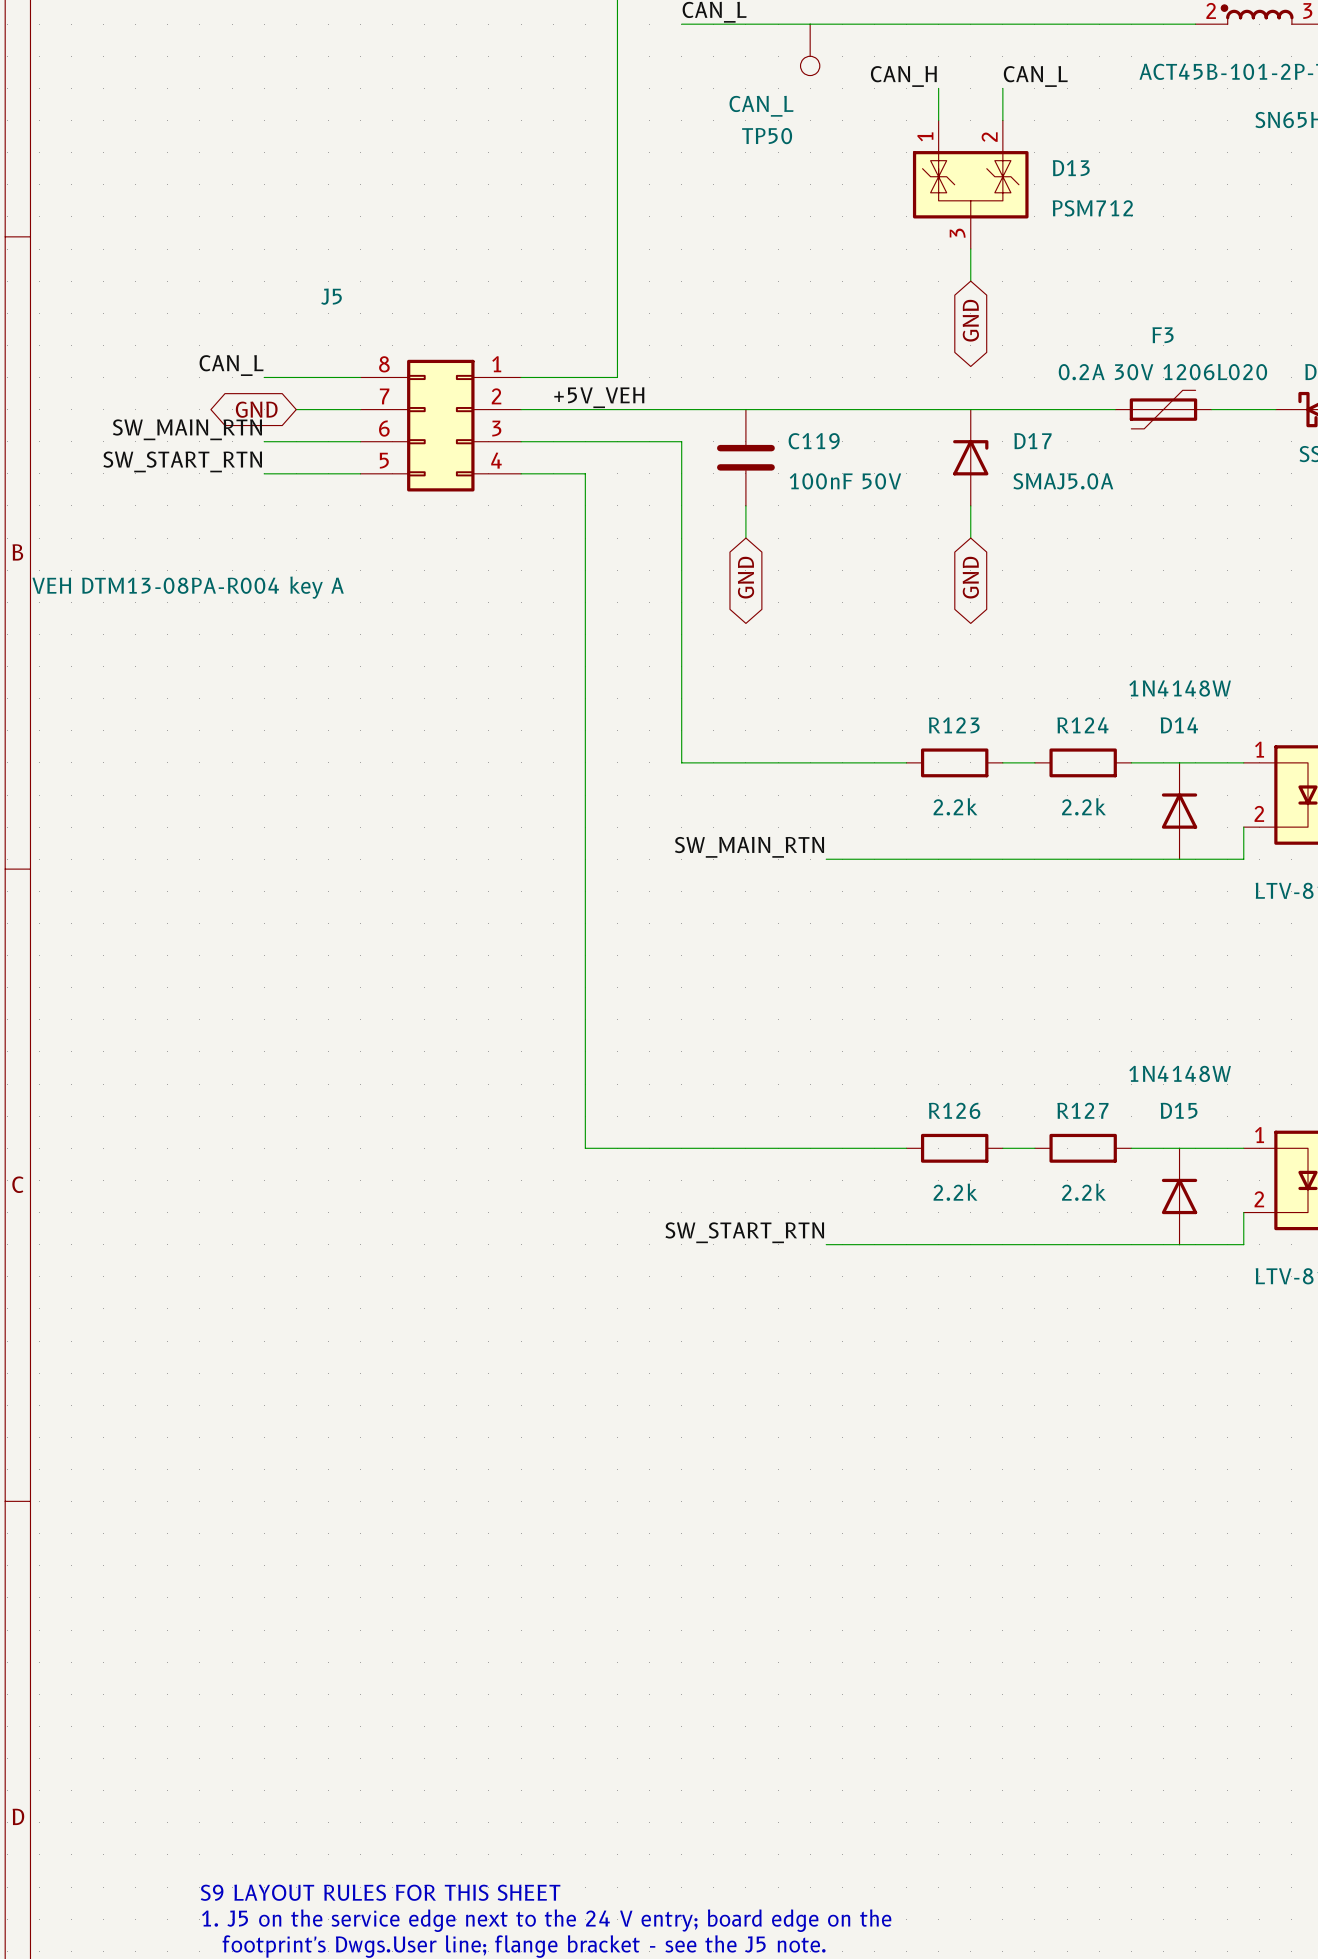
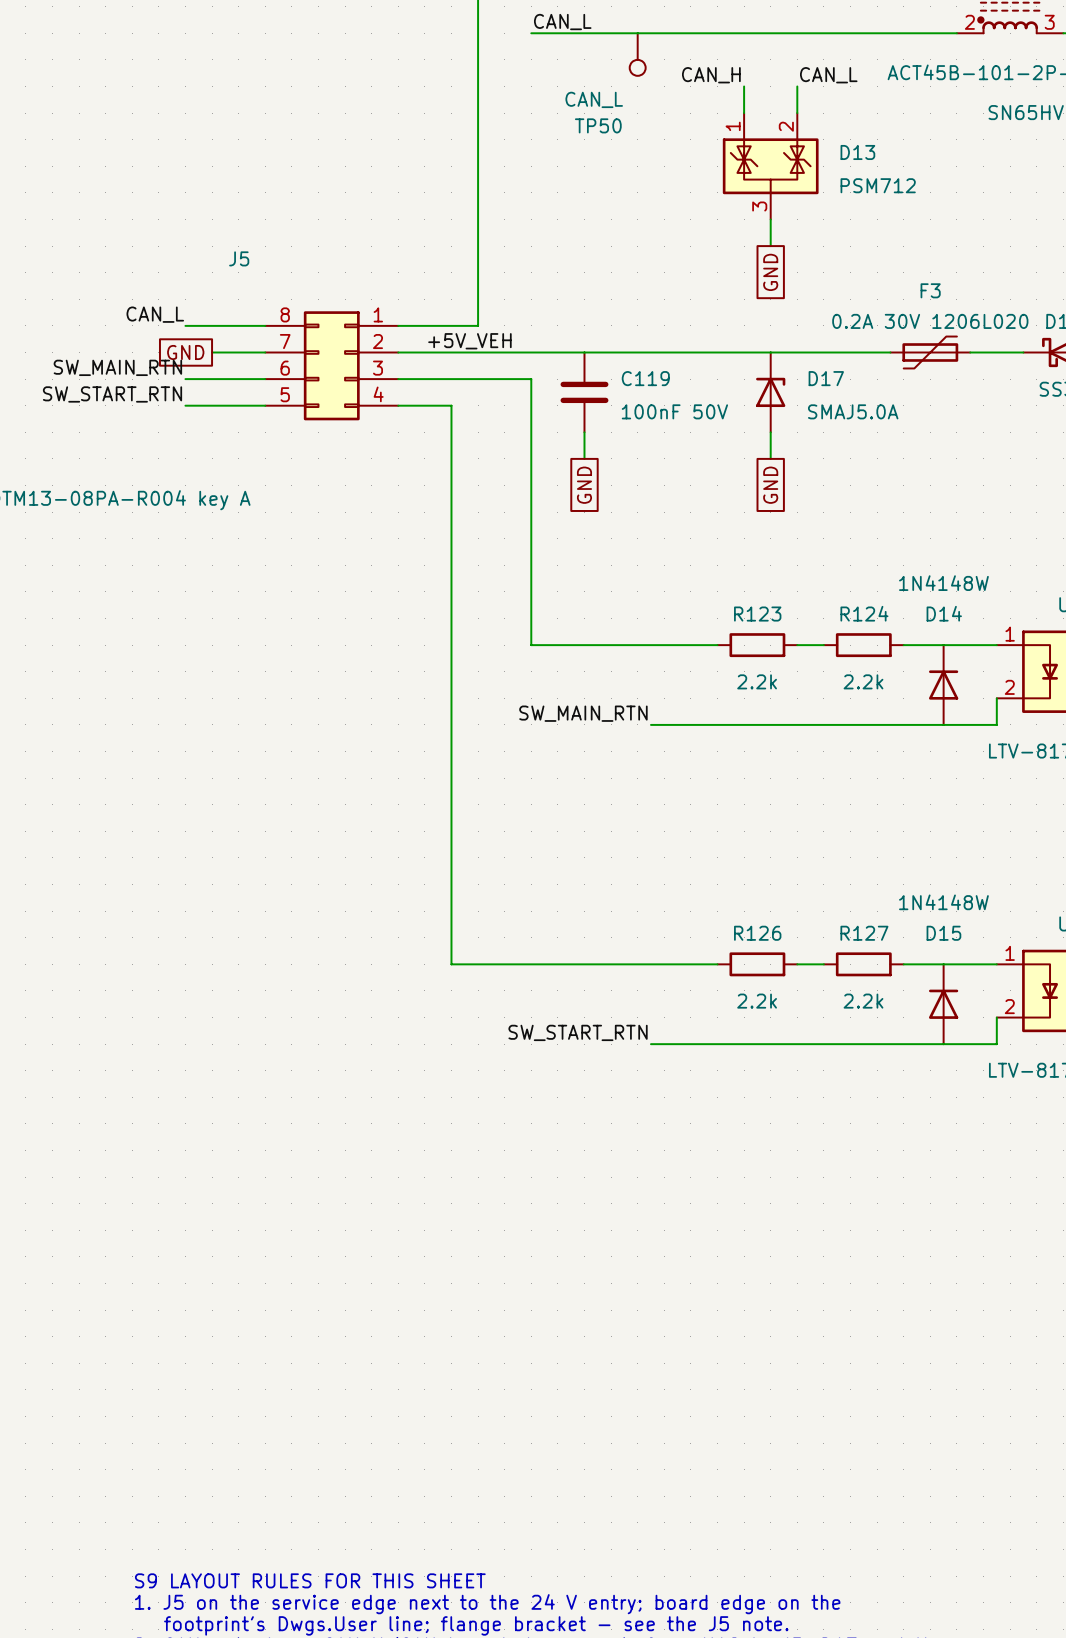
global label shape: bidirectional (970, 320) -> passive (770, 272)
global label shape: bidirectional (256, 409) -> passive (185, 352)
global label shape: bidirectional (746, 577) -> passive (584, 485)
global label shape: bidirectional (970, 577) -> passive (770, 485)

